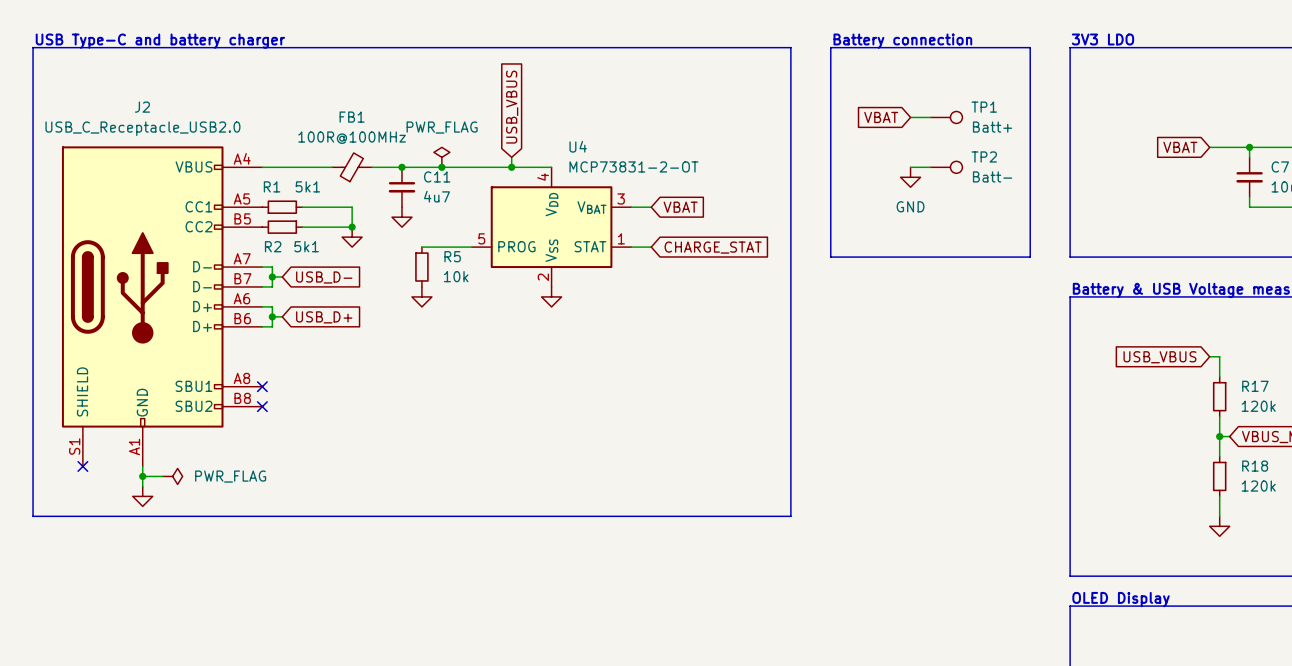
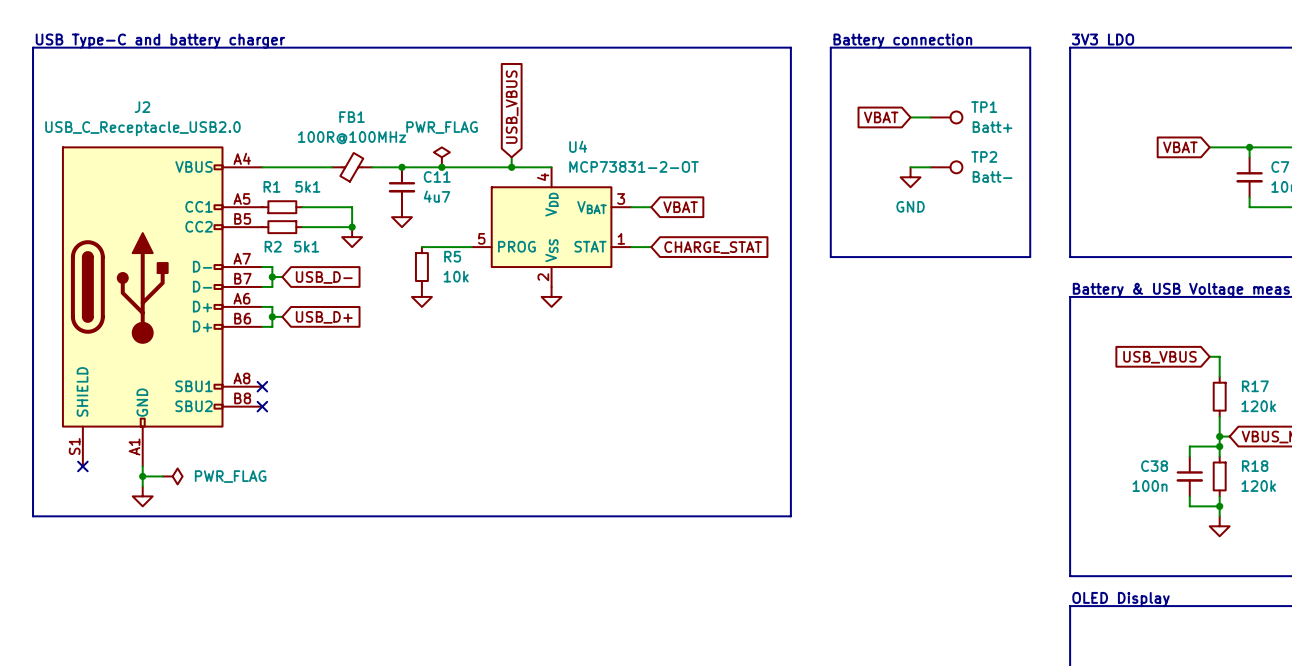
wire: none -> (1219, 446) (1189, 446) (1189, 456)
junction: none -> (1219, 446)
C38: none -> 100n (1189, 476)
wire: none -> (1189, 496) (1189, 506) (1219, 506)
junction: none -> (1219, 506)

